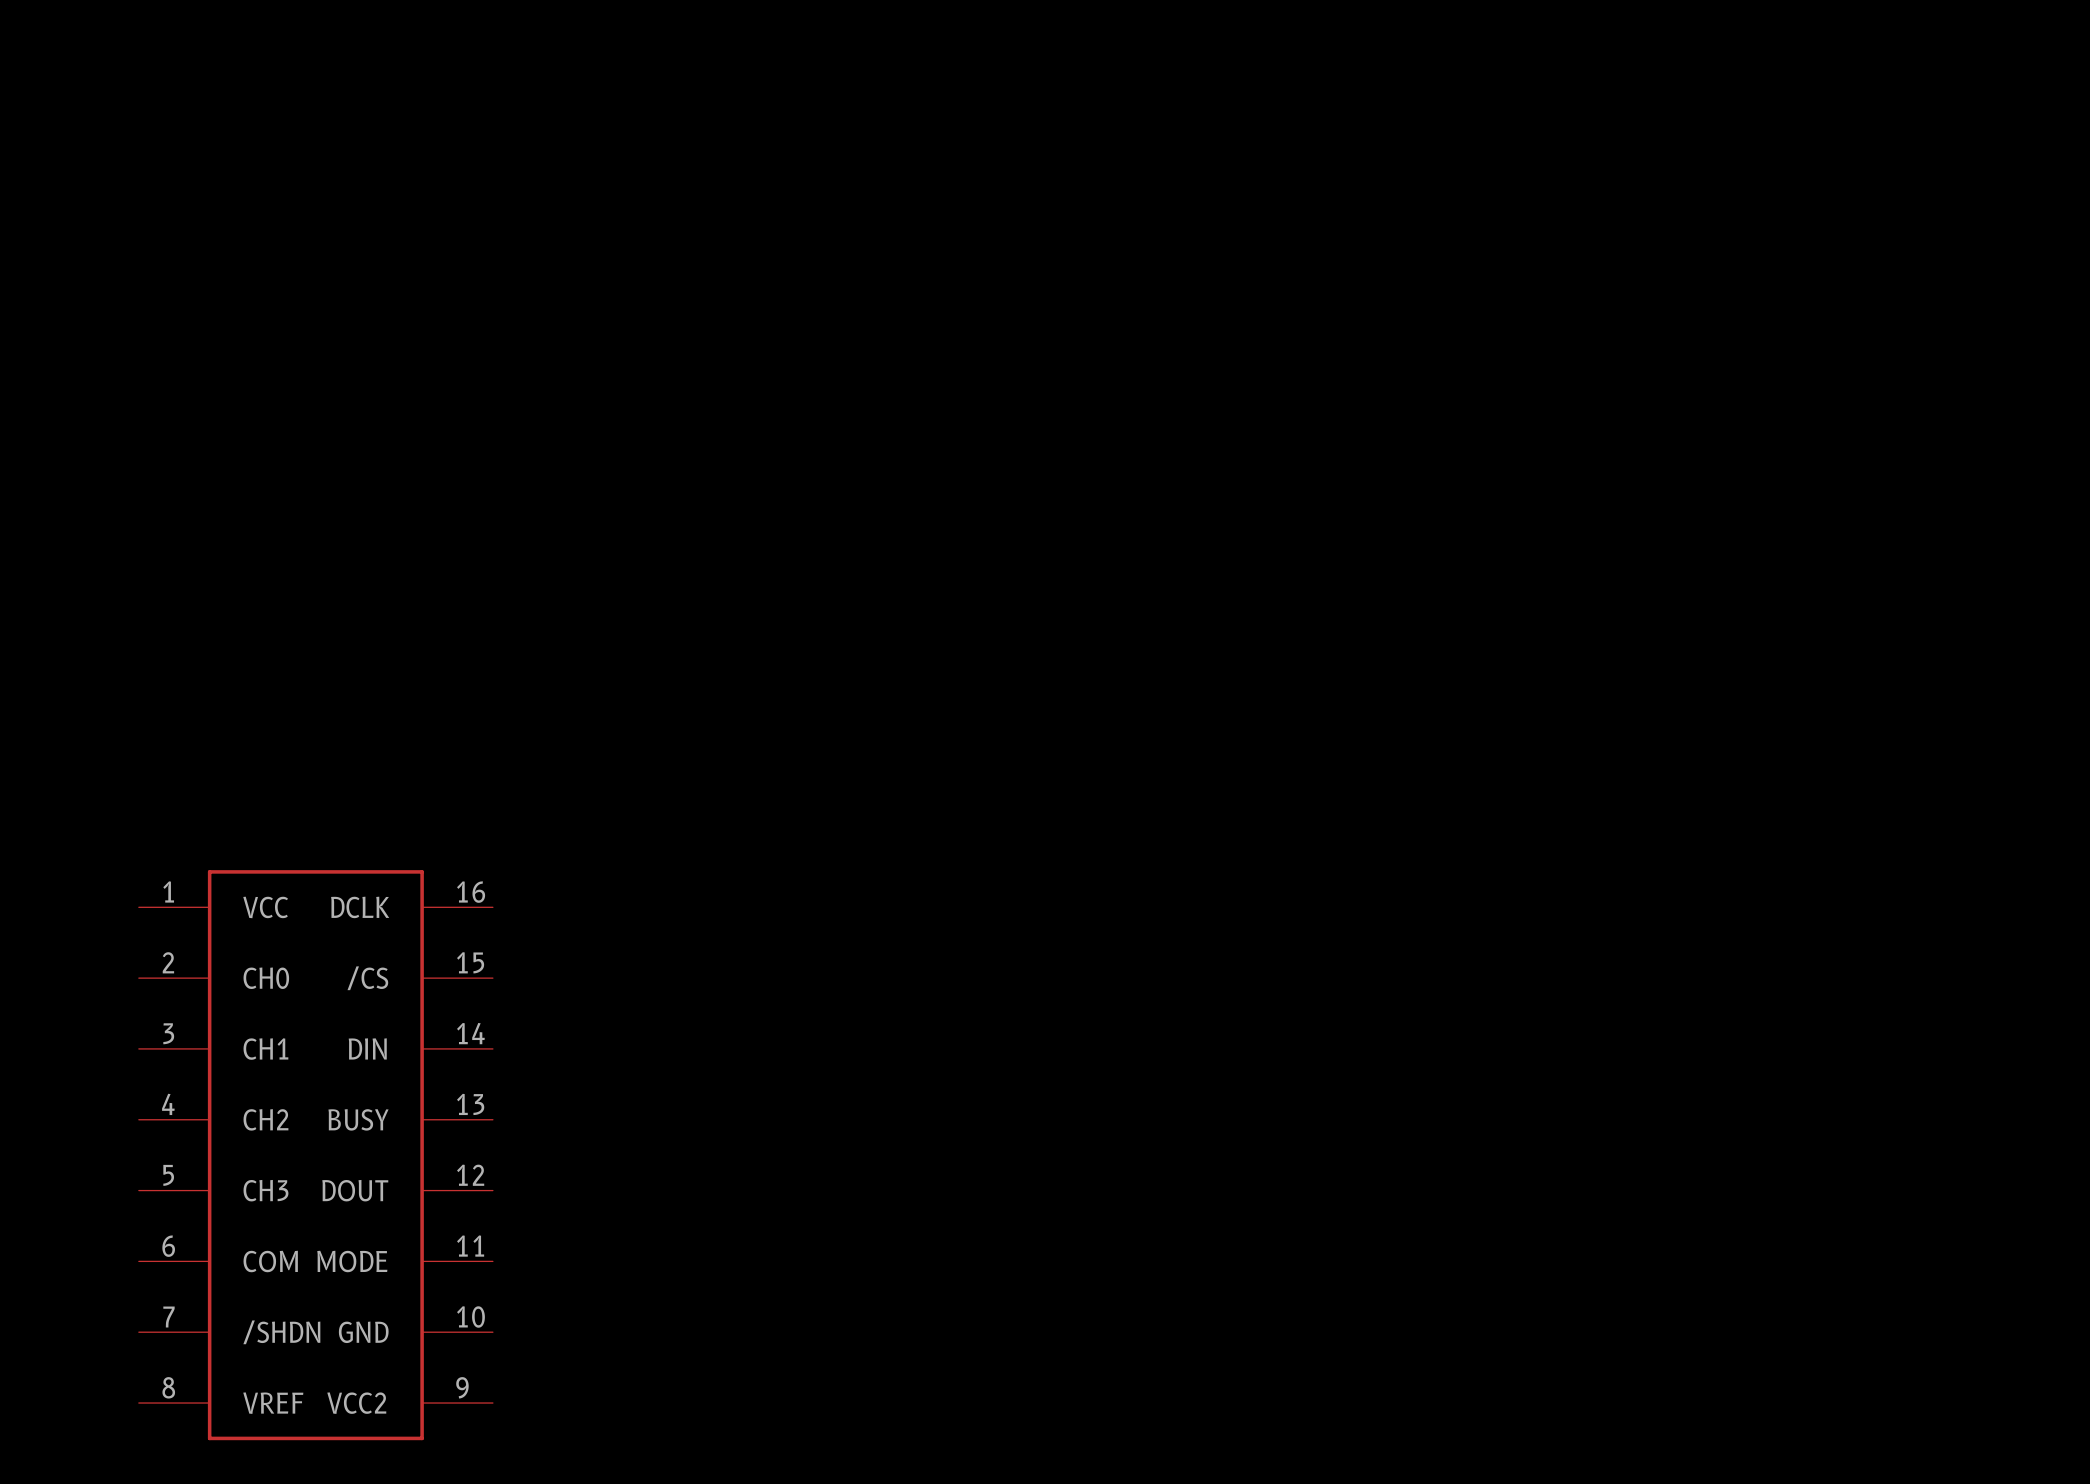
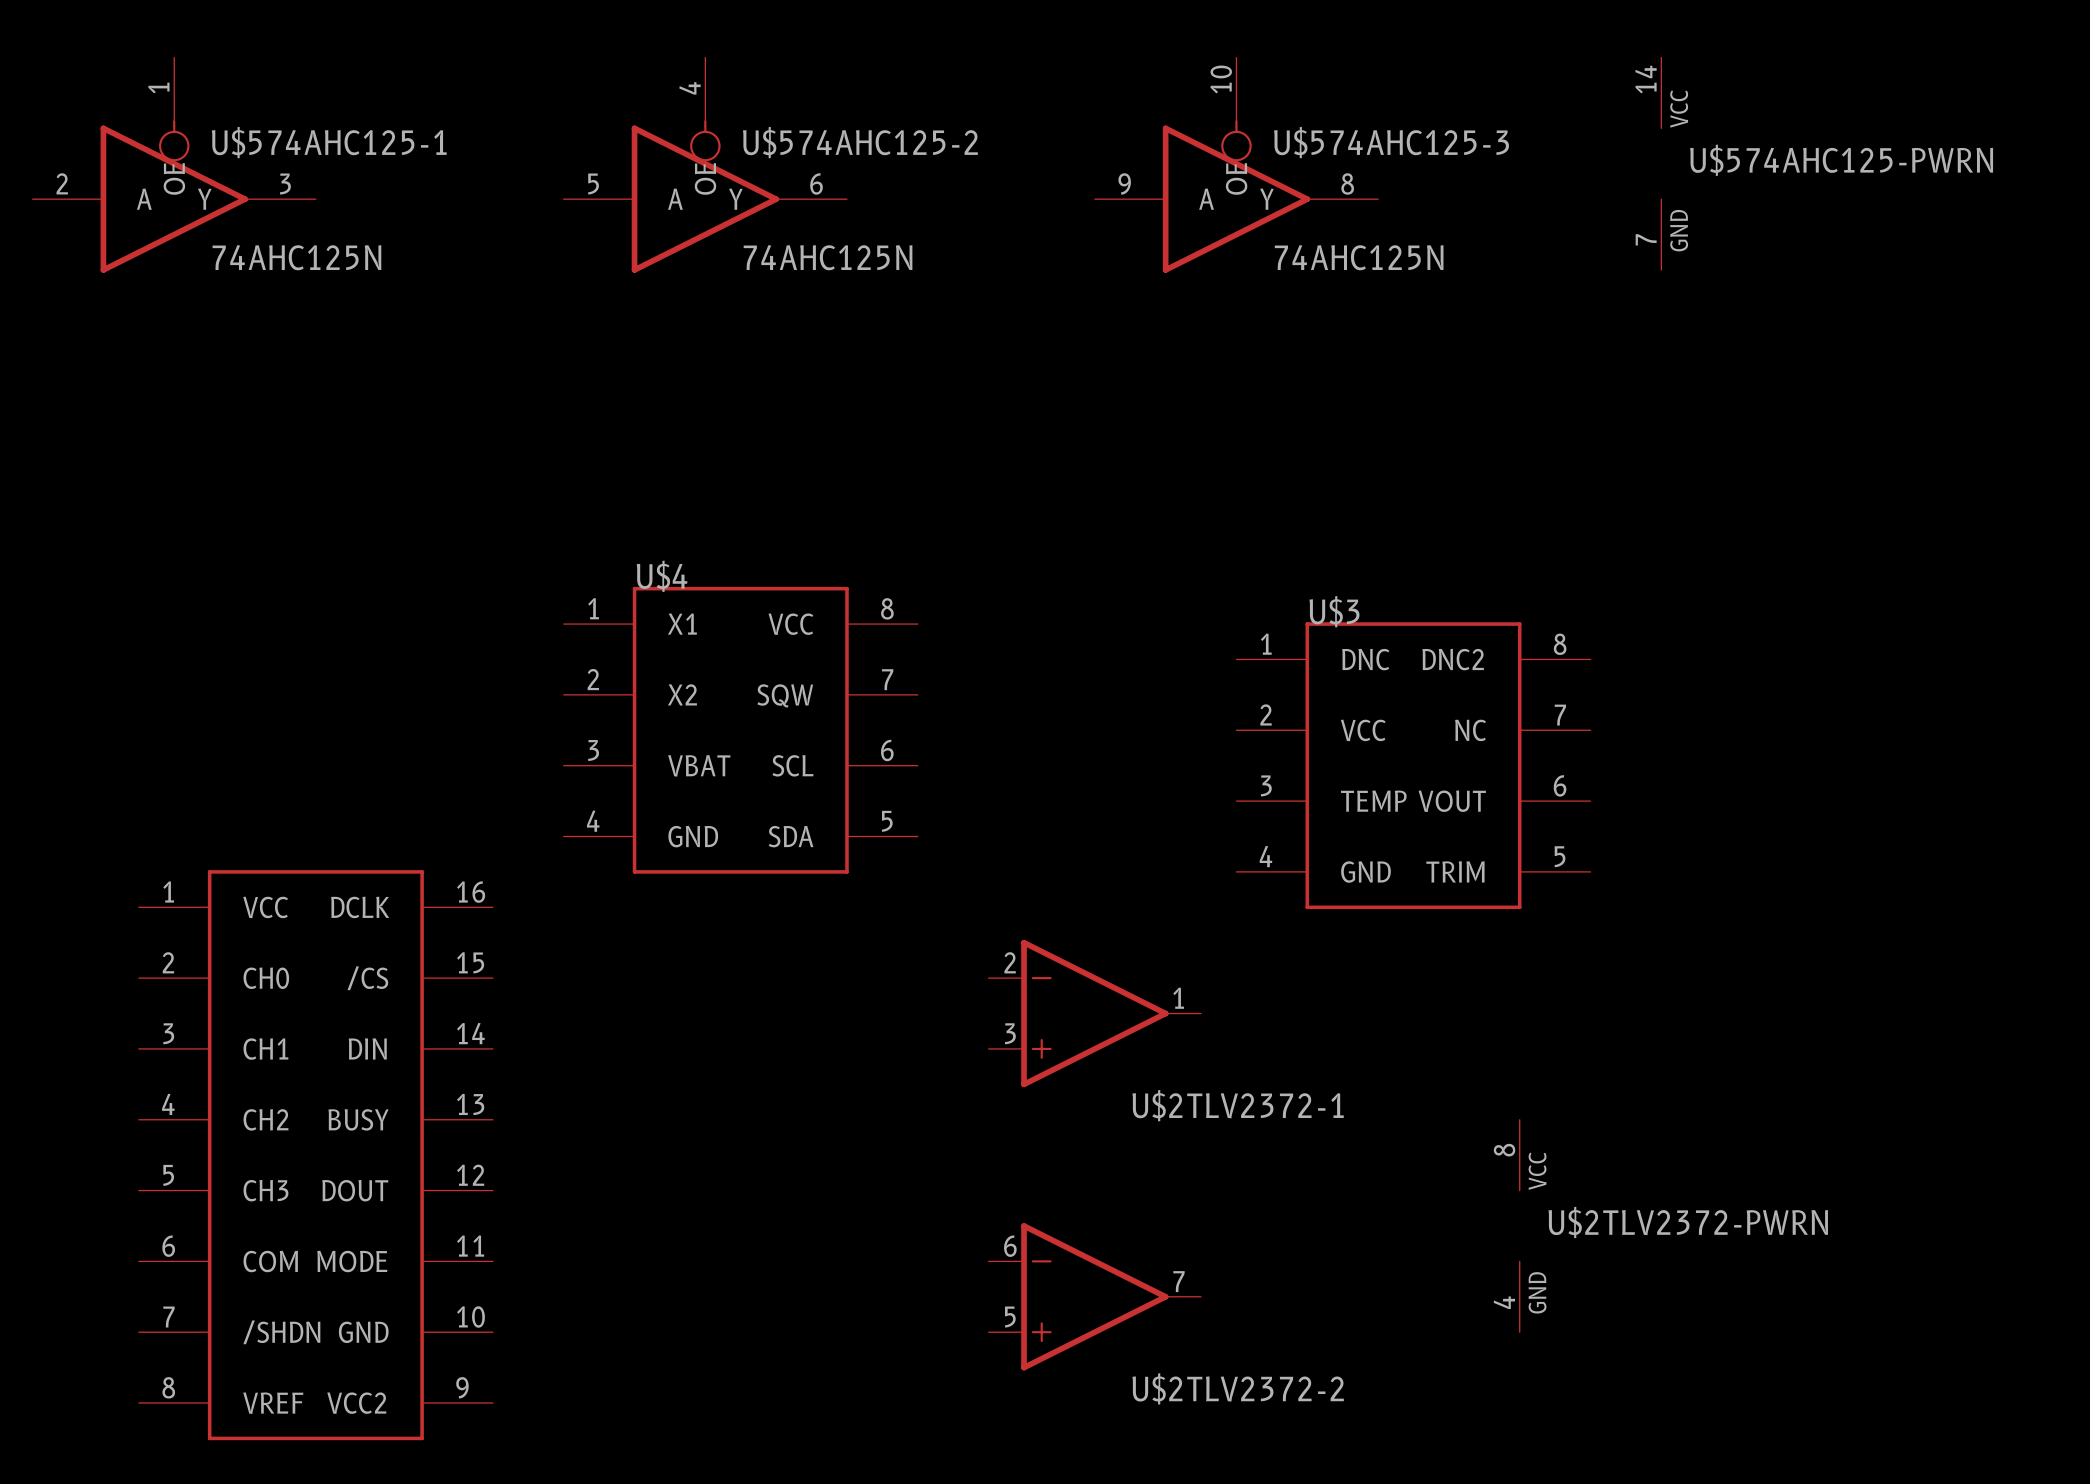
U$574AHC125-PWRN: none -> (1661, 163)
U$574AHC125-1: none -> 74AHC125N (174, 165)
U$574AHC125-2: none -> 74AHC125N (705, 165)
U$574AHC125-3: none -> 74AHC125N (1236, 165)
U$4: none -> (740, 730)
U$3: none -> (1413, 765)
U$2TLV2372-1: none -> (1094, 1013)
U$2TLV2372-PWRN: none -> (1519, 1225)
U$2TLV2372-2: none -> (1094, 1296)

